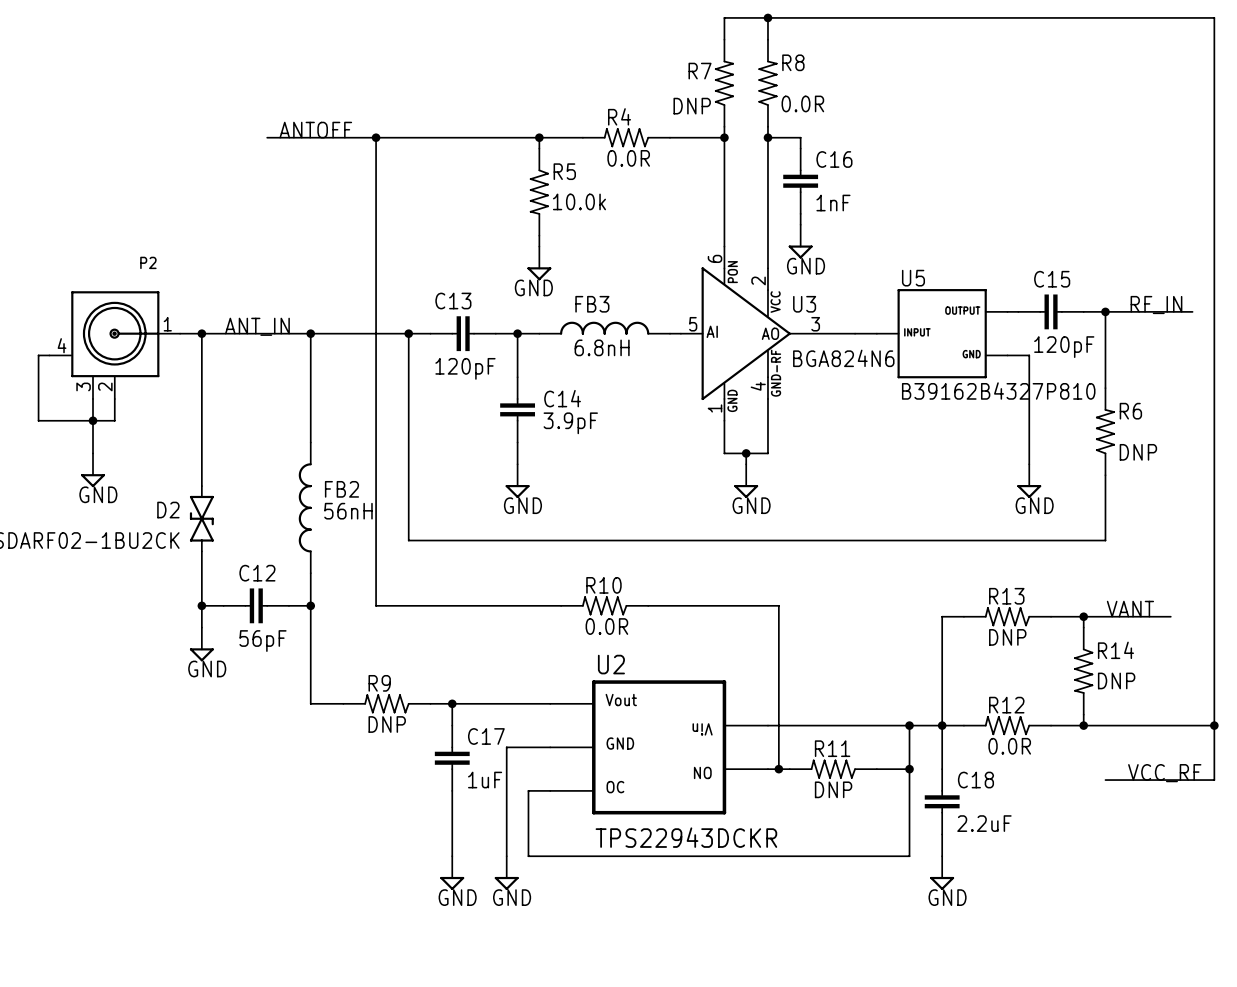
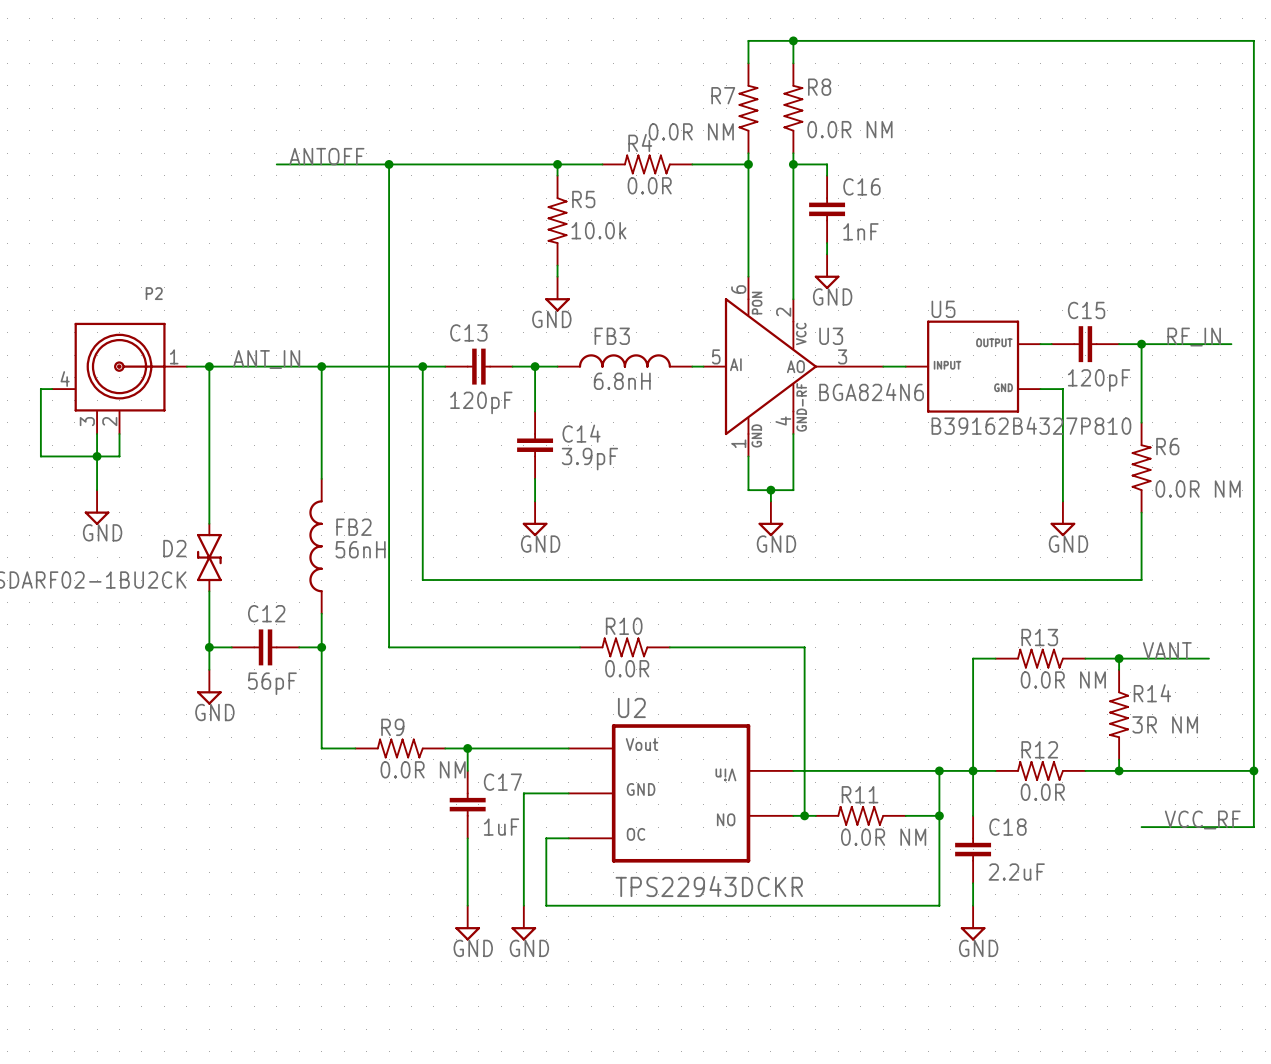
R8 value: 0.0R (802, 103) -> 0.0R NM (849, 129)
R7 value: DNP (692, 106) -> 0.0R NM (691, 131)
R6 value: DNP (1138, 452) -> 0.0R NM (1198, 489)
R13 value: DNP (1007, 637) -> 0.0R NM (1063, 679)
R14 value: DNP (1116, 680) -> 3R NM (1165, 724)
R9 value: DNP (387, 724) -> 0.0R NM (423, 769)
R11 value: DNP (833, 789) -> 0.0R NM (883, 837)

